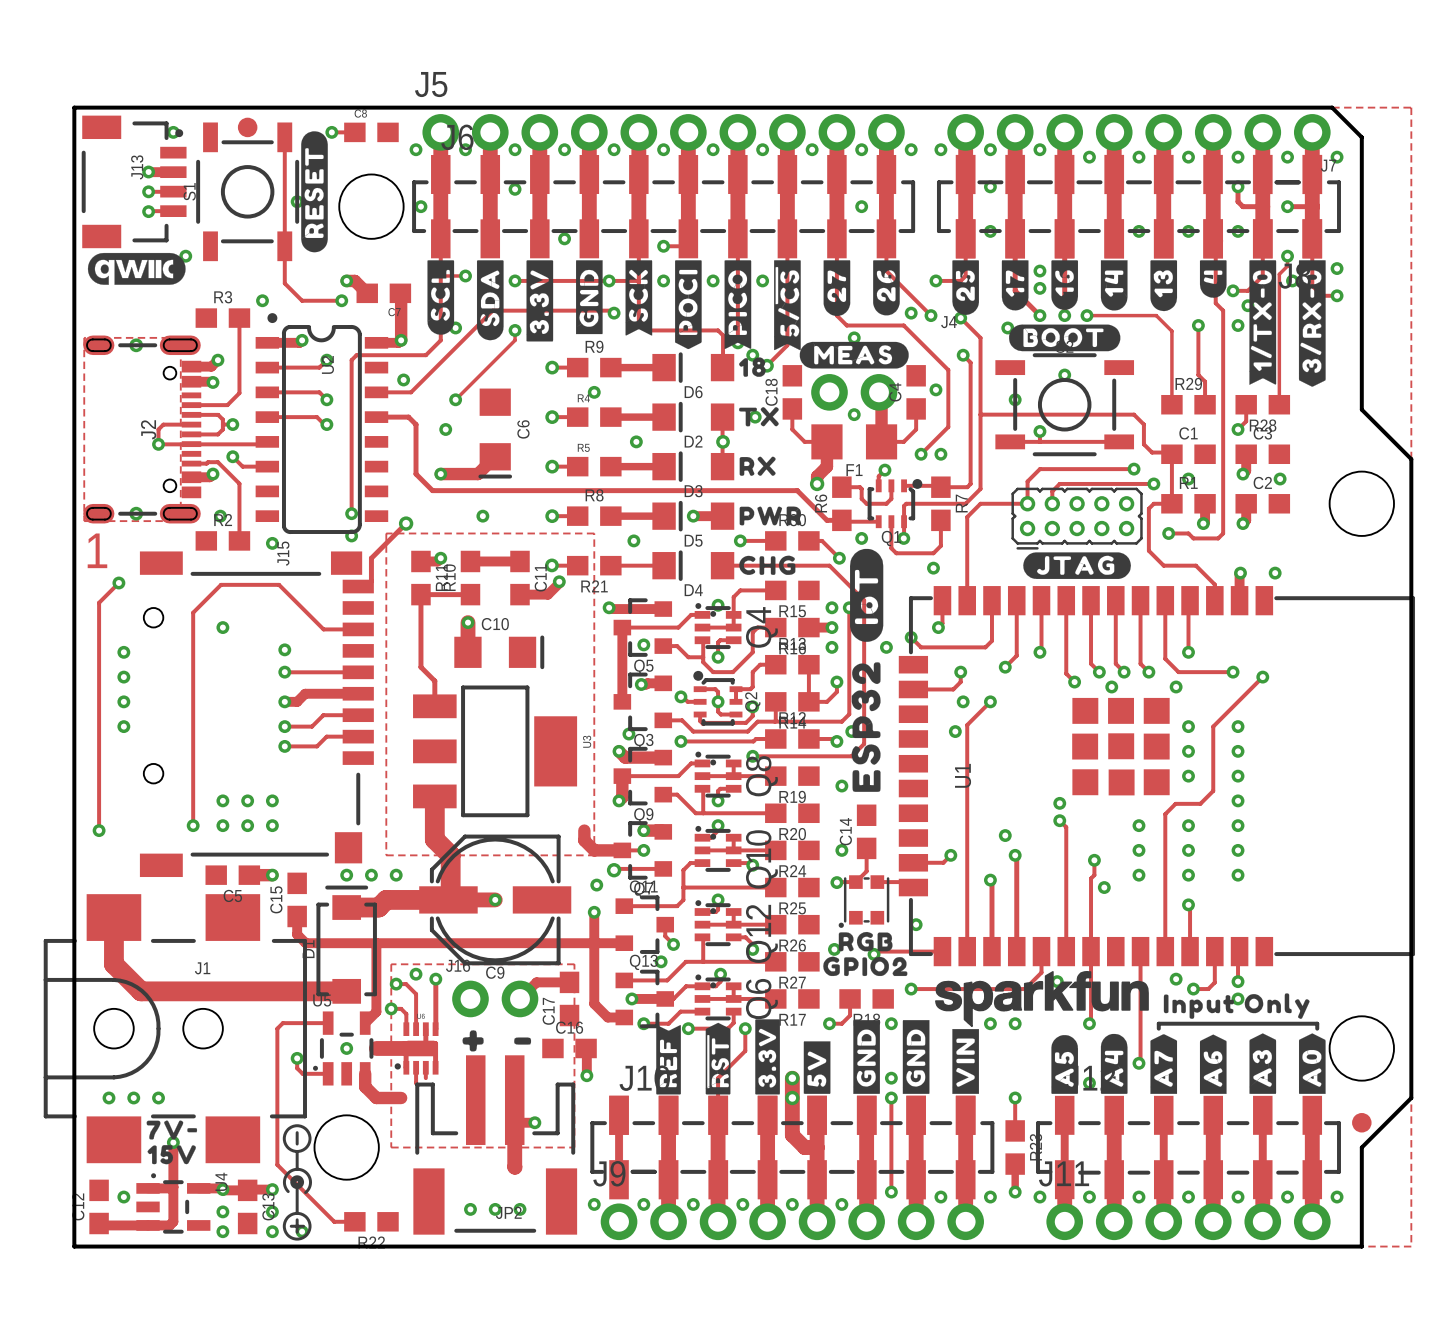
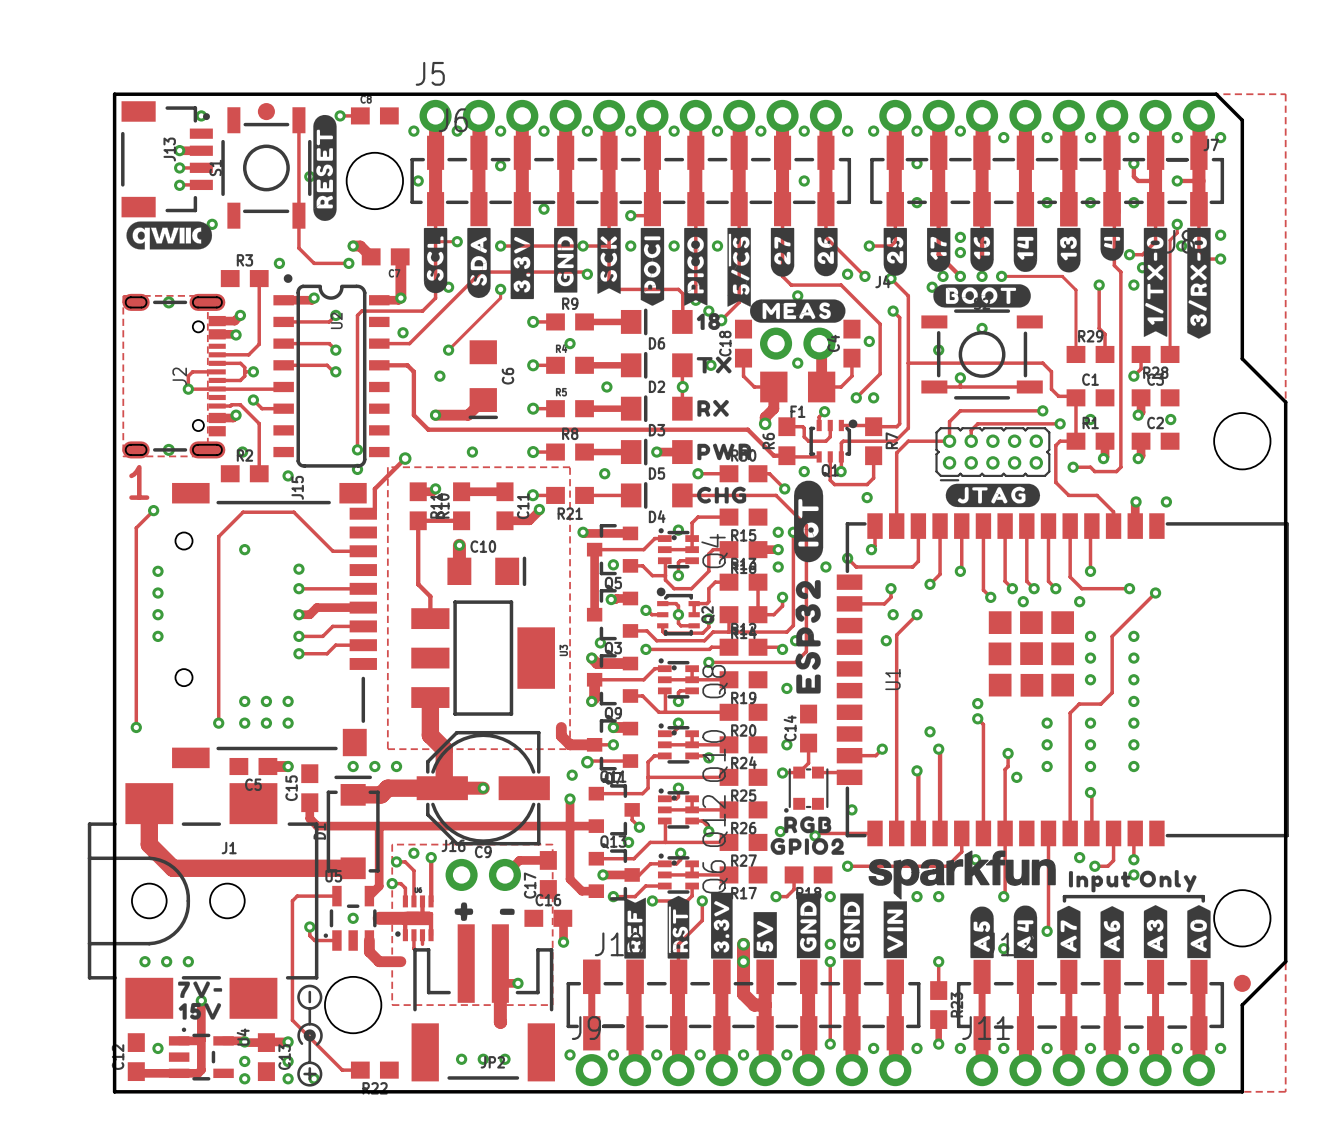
via: none -> (943, 276)

